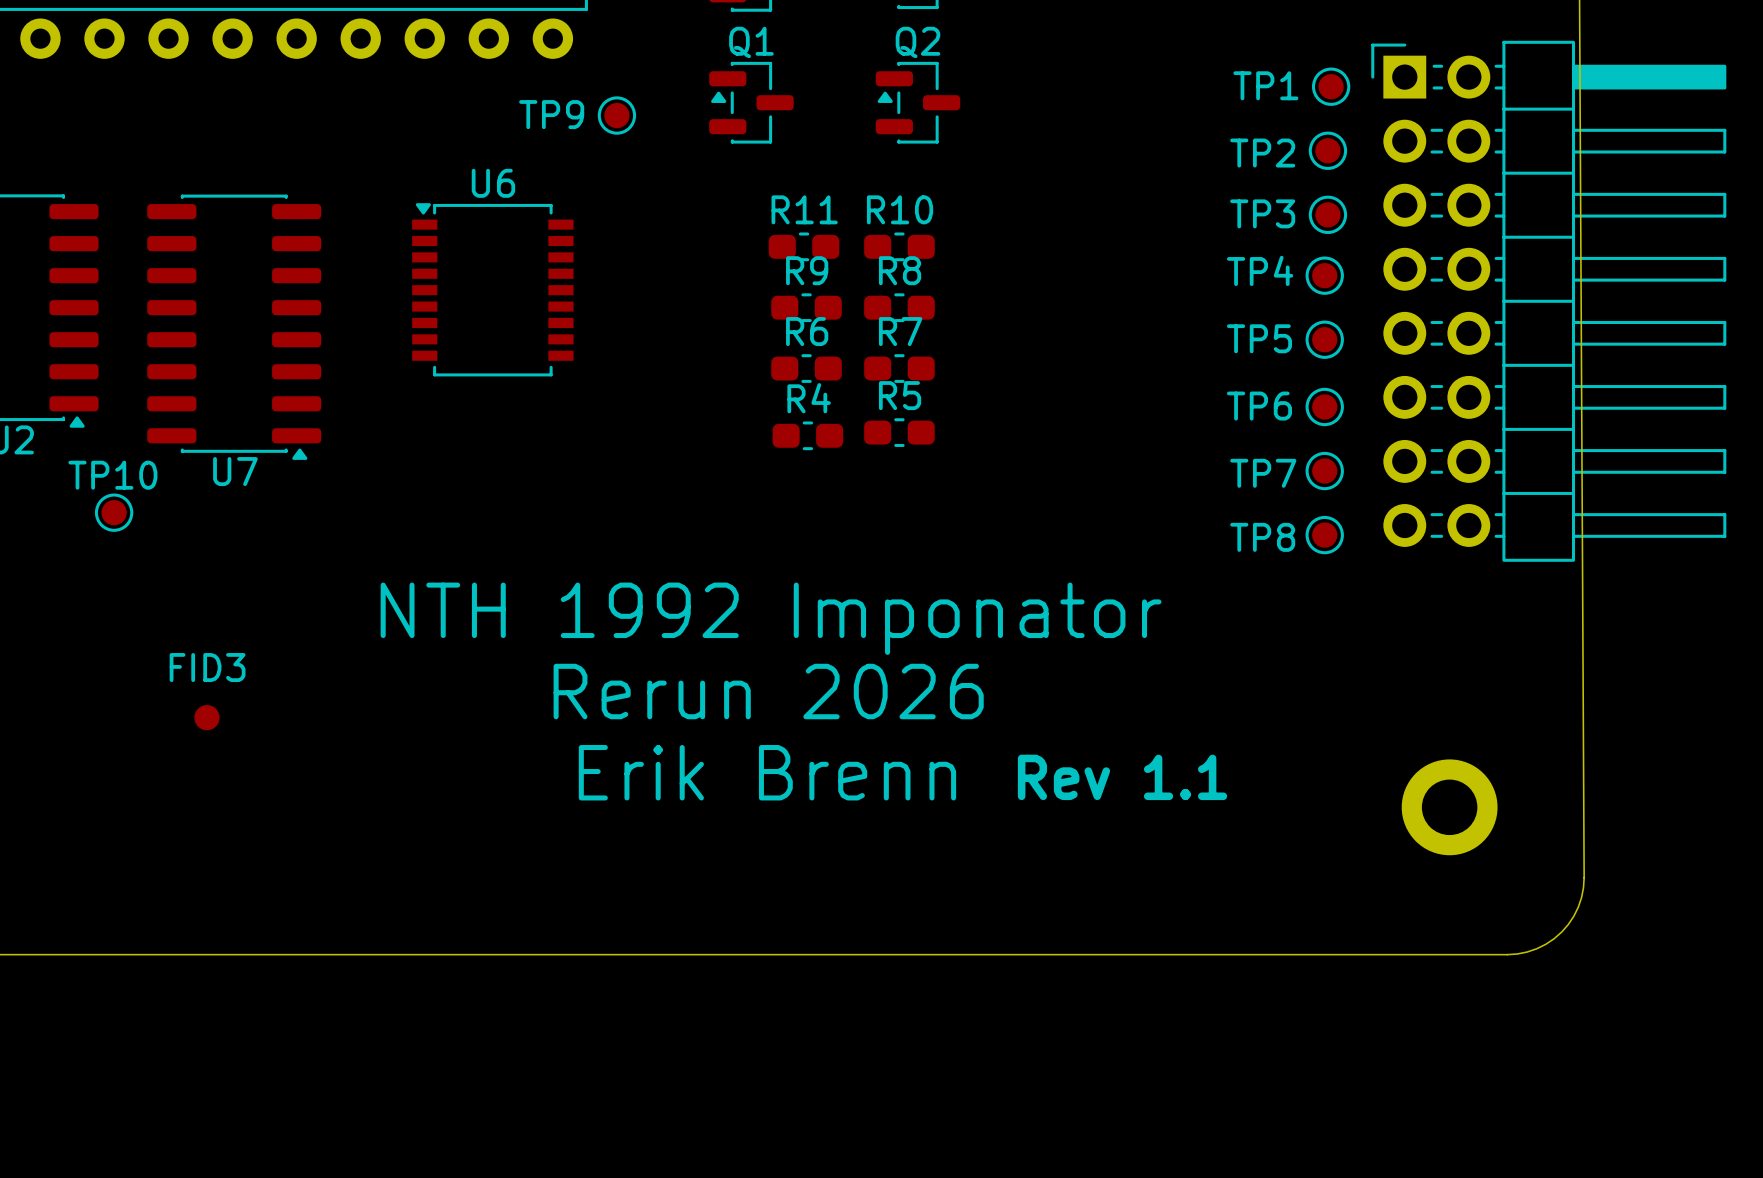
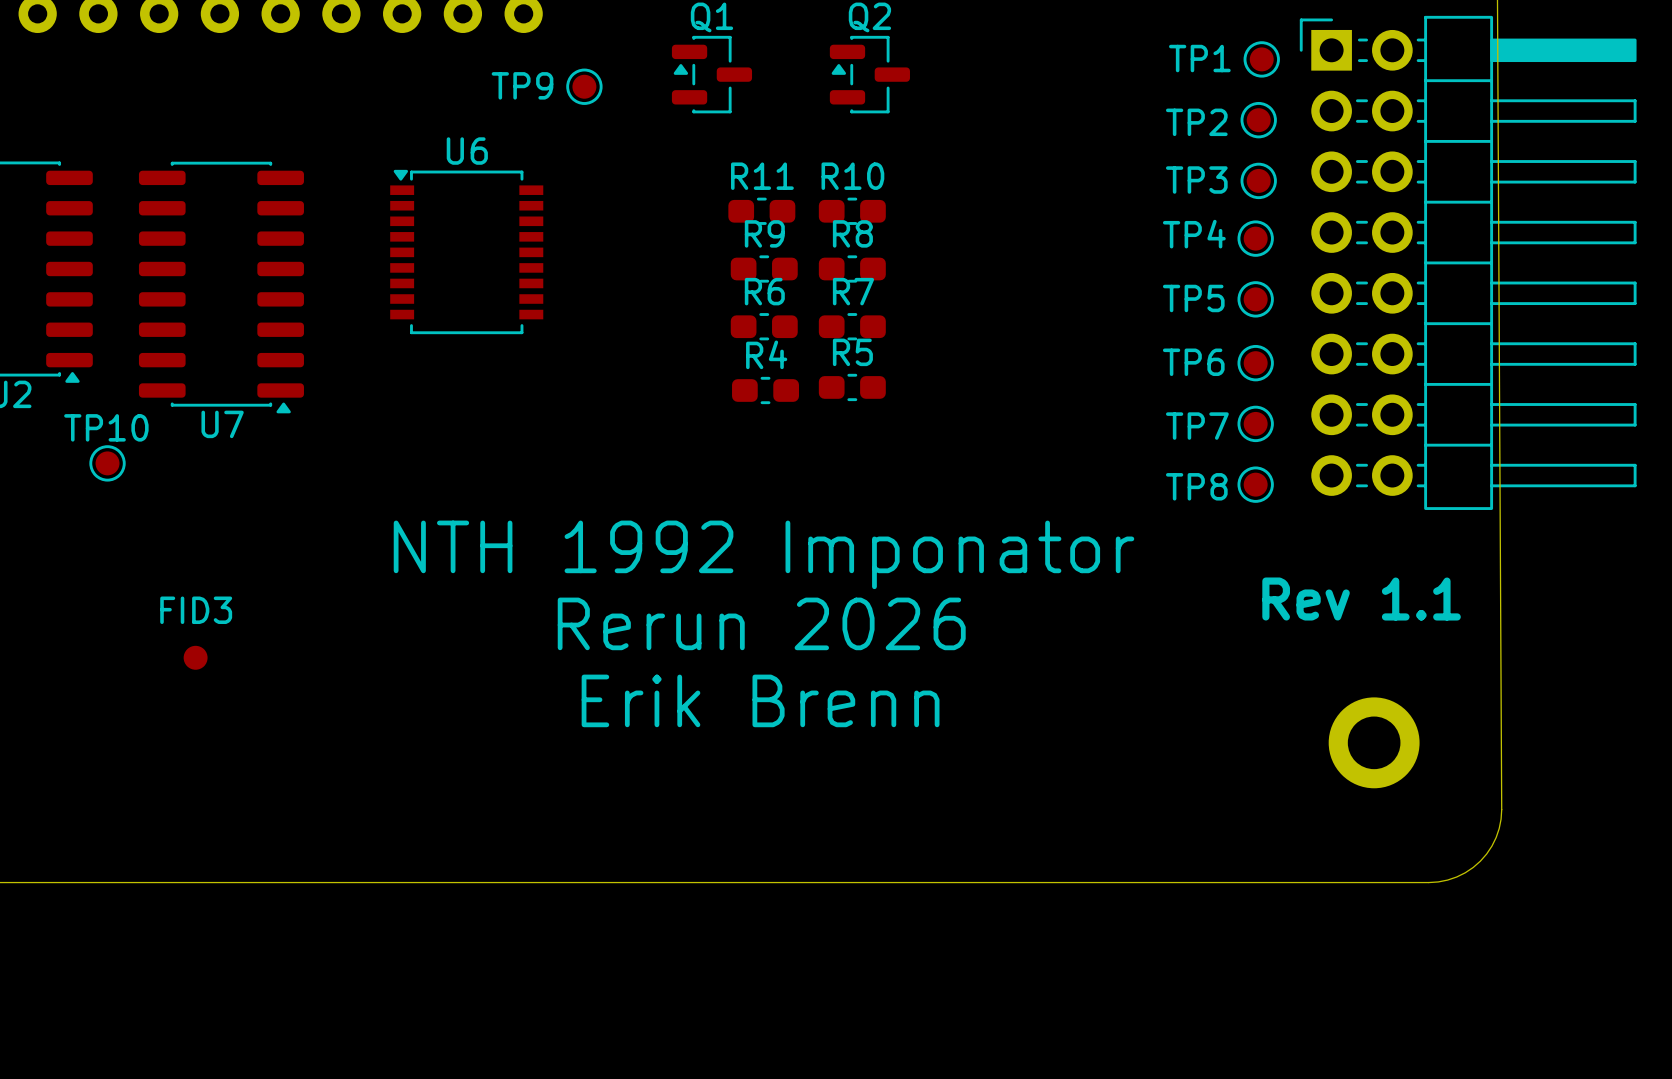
text position: NTH 1992 Imponator (771, 618) -> NTH 1992 Imponator (763, 554)
text position: Rerun 2026 (768, 691) -> Rerun 2026 (761, 623)
text position: Erik Brenn (767, 772) -> Erik Brenn (760, 700)
text position: Rev 1.1 (1122, 777) -> Rev 1.1 (1361, 599)

